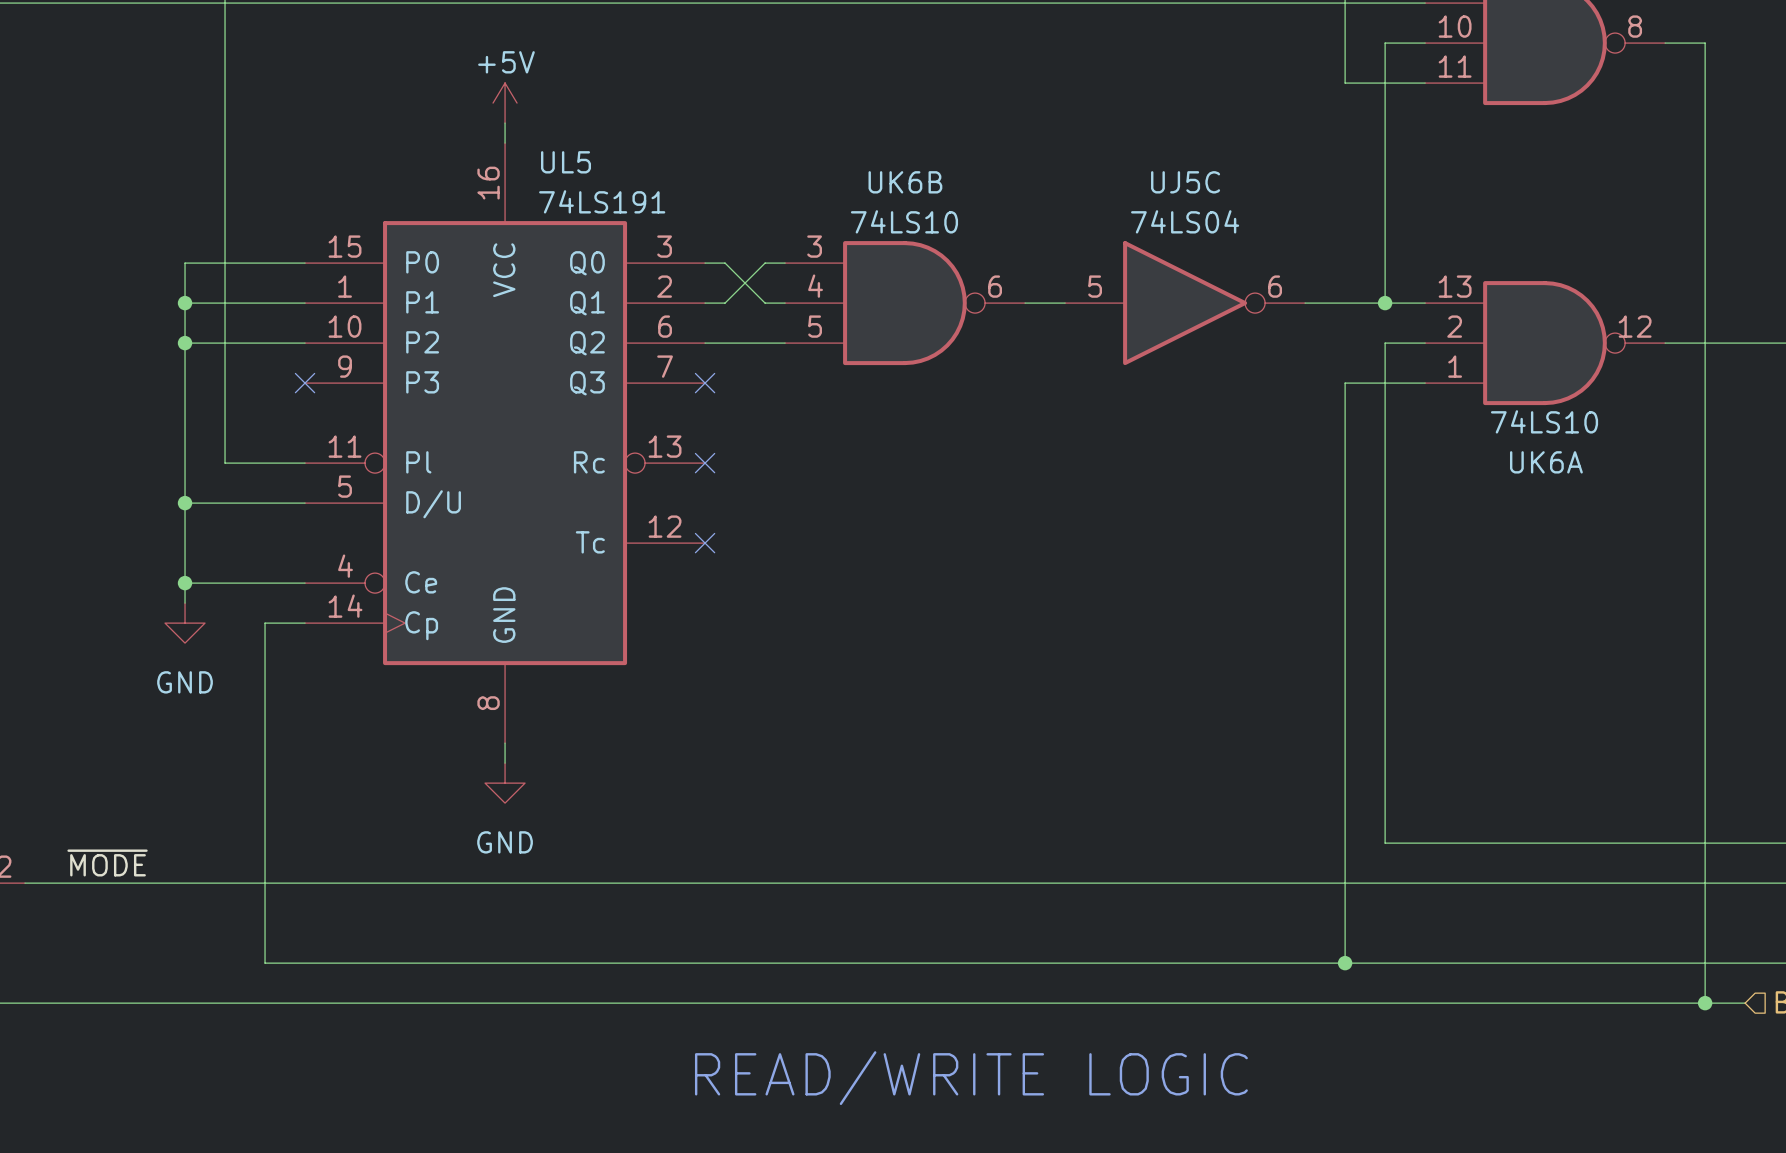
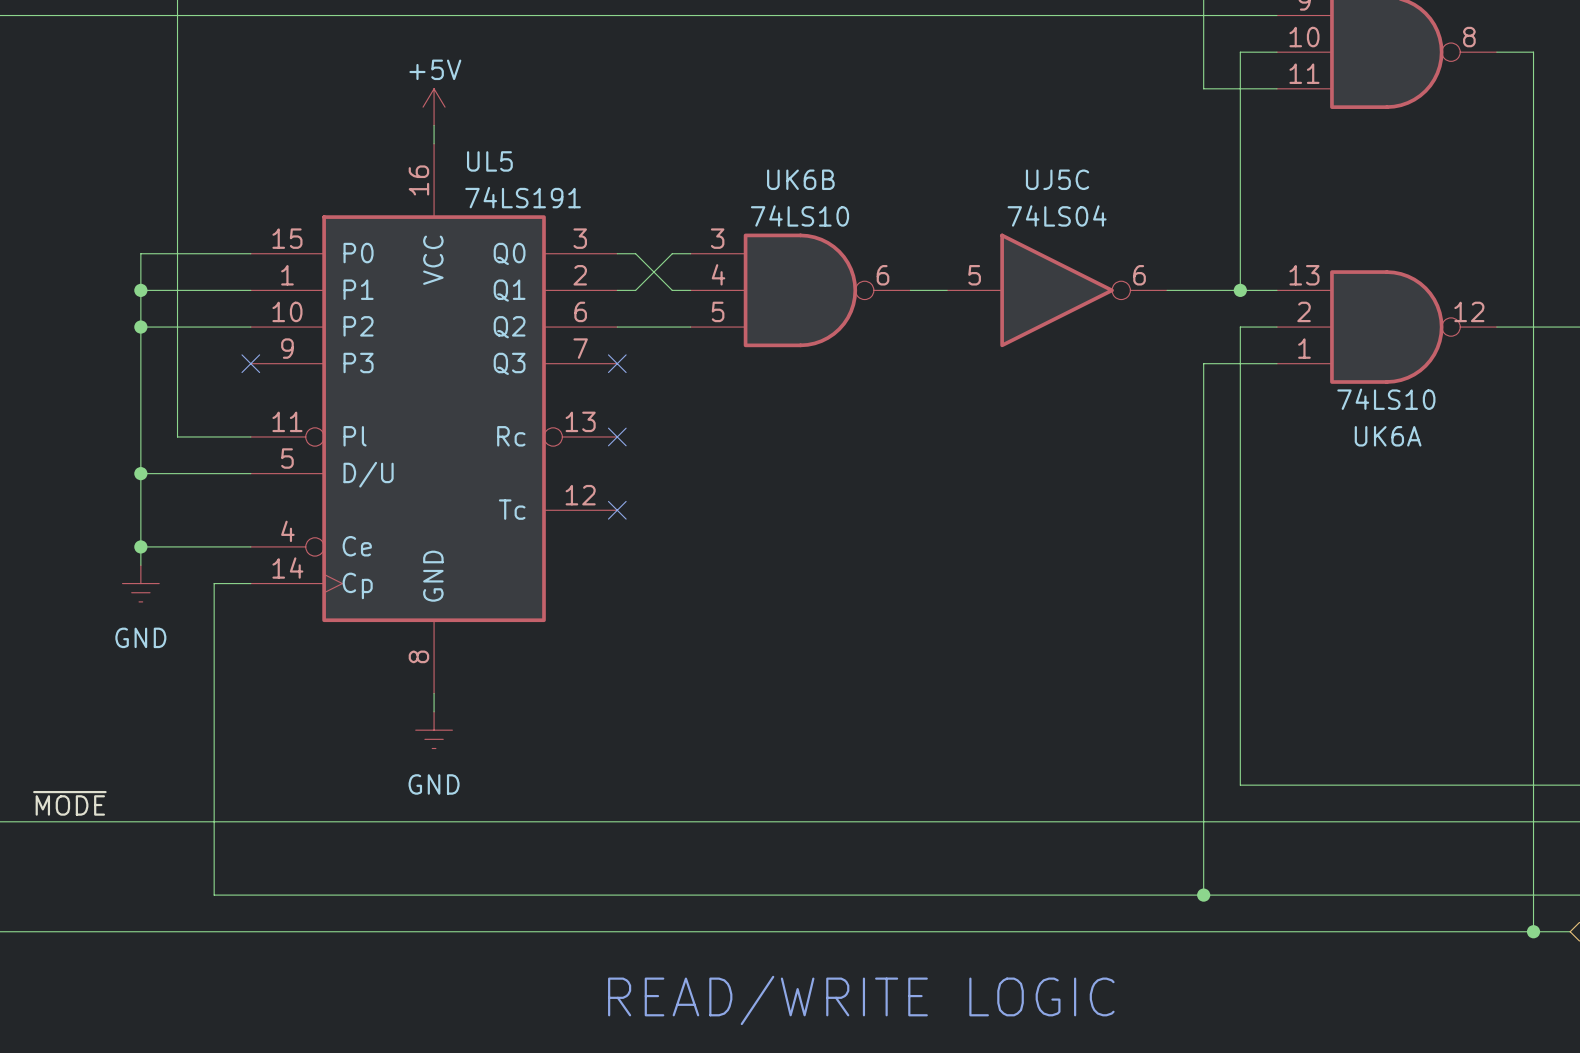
power symbol shape: [165, 603, 206, 644] -> [122, 565, 160, 602]
power symbol shape: [485, 763, 526, 804] -> [415, 711, 453, 749]

